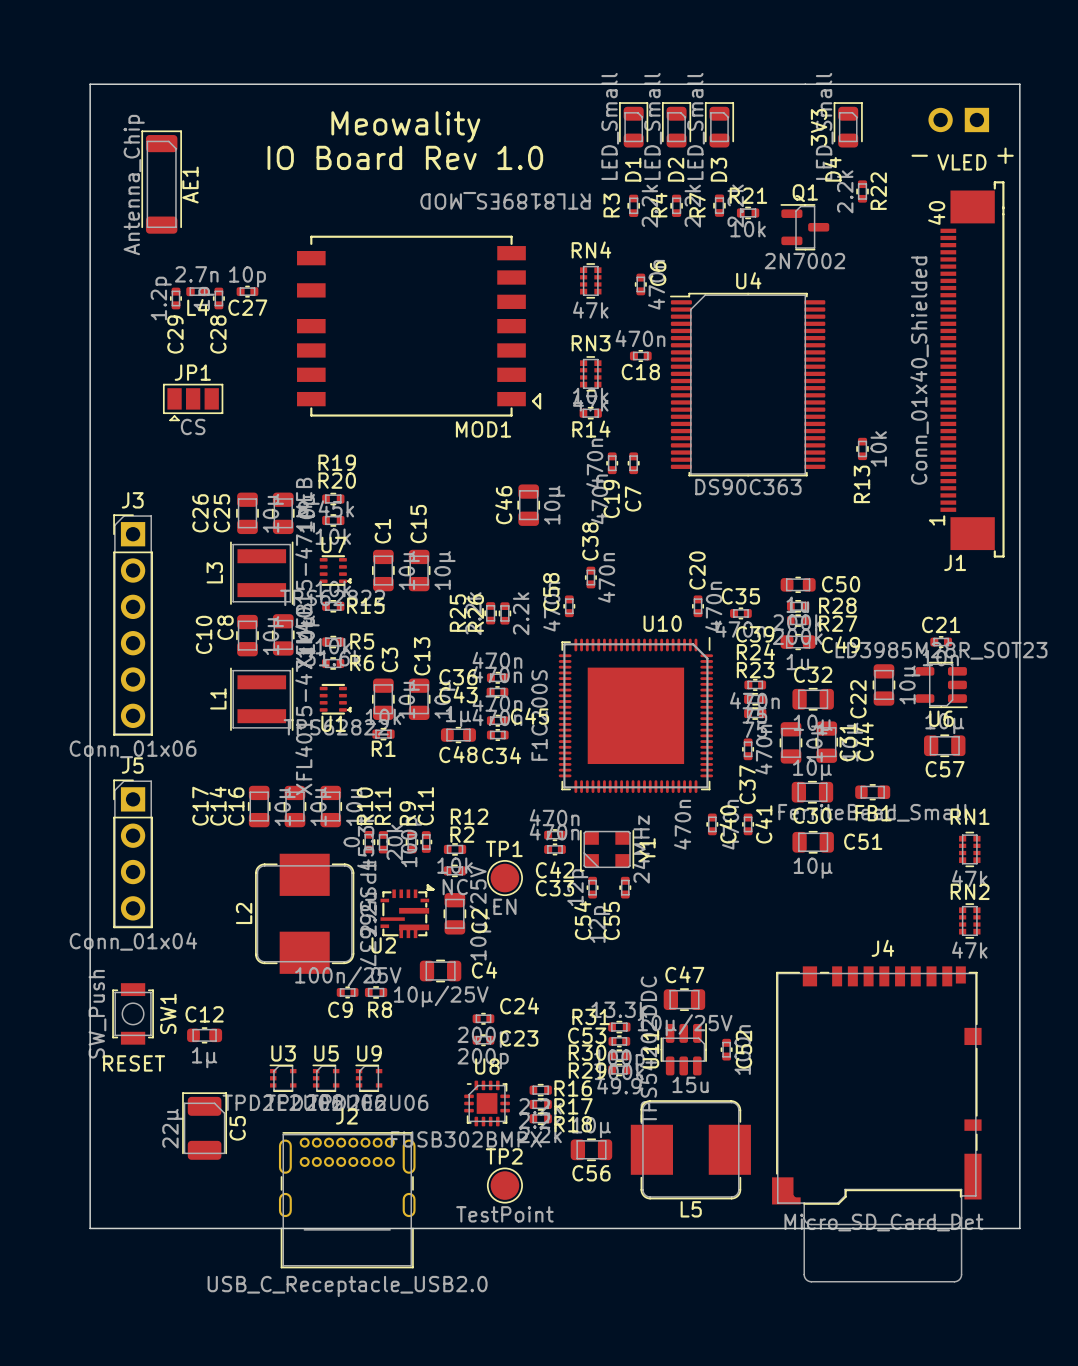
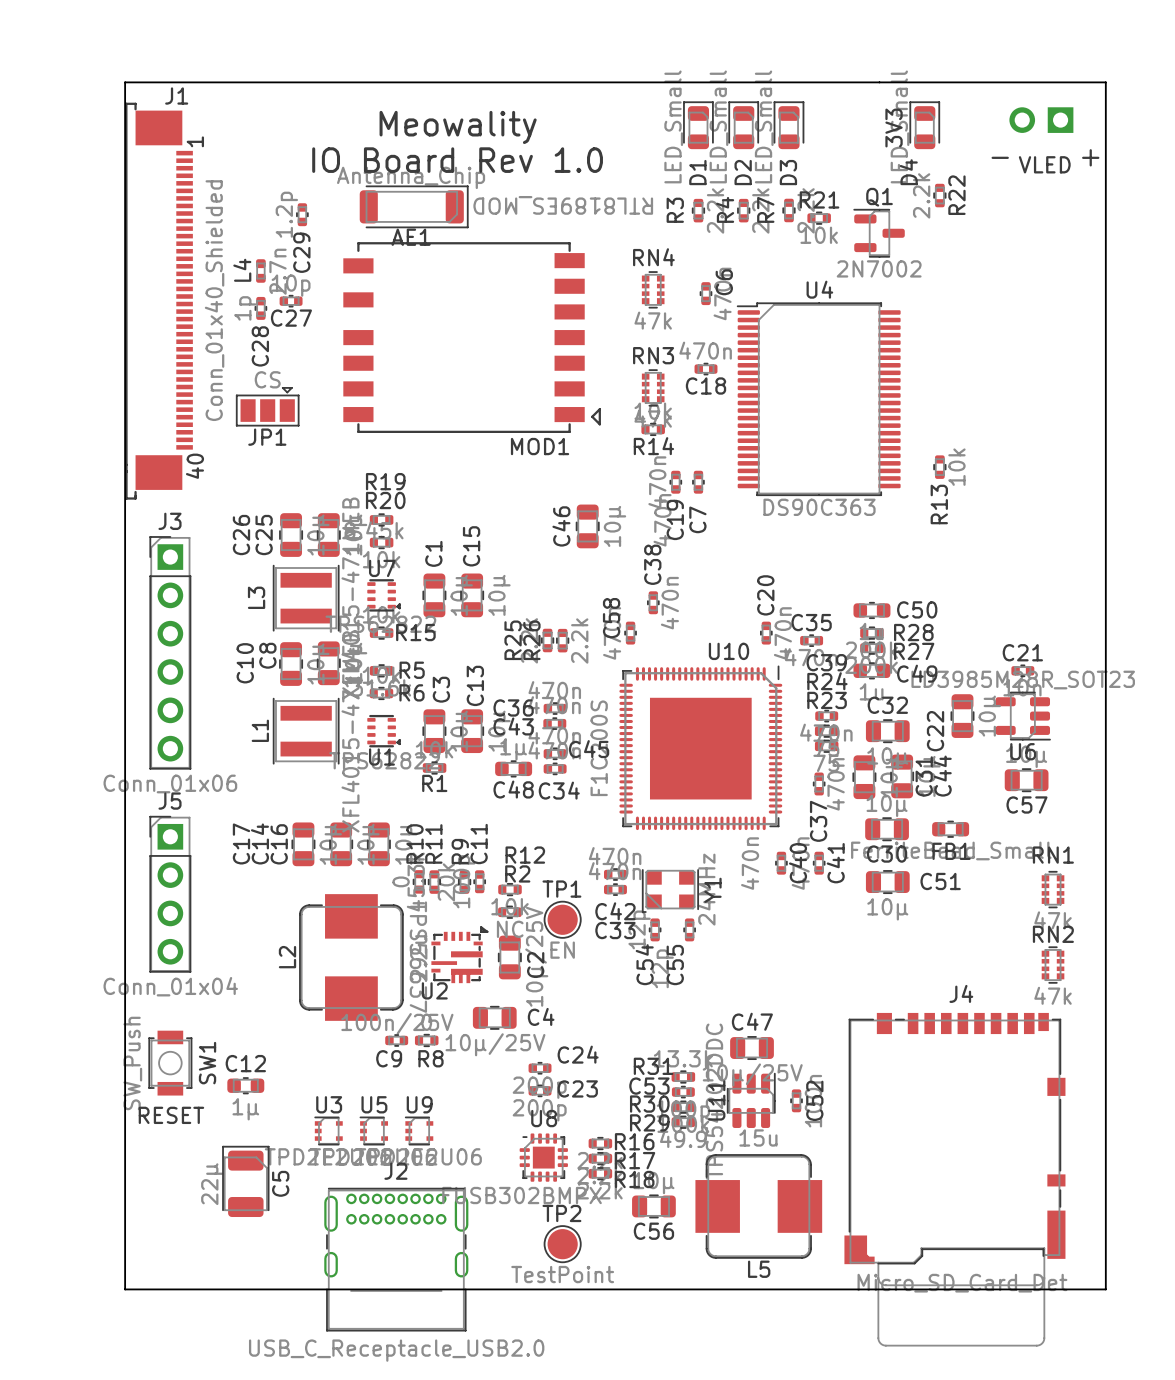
AE1 rotation: 0° (161, 182) -> 90° clockwise (414, 206)
AE1 position: (161, 182) -> (414, 206)
L4 rotation: 0° (197, 291) -> 90° clockwise (260, 270)
L4 position: (197, 291) -> (260, 270)
C29 position: (175, 298) -> (302, 214)
J1 rotation: 0° (972, 369) -> 180° (159, 301)
J1 position: (972, 369) -> (159, 301)
JP1 rotation: 0° (193, 402) -> 180° (267, 406)

